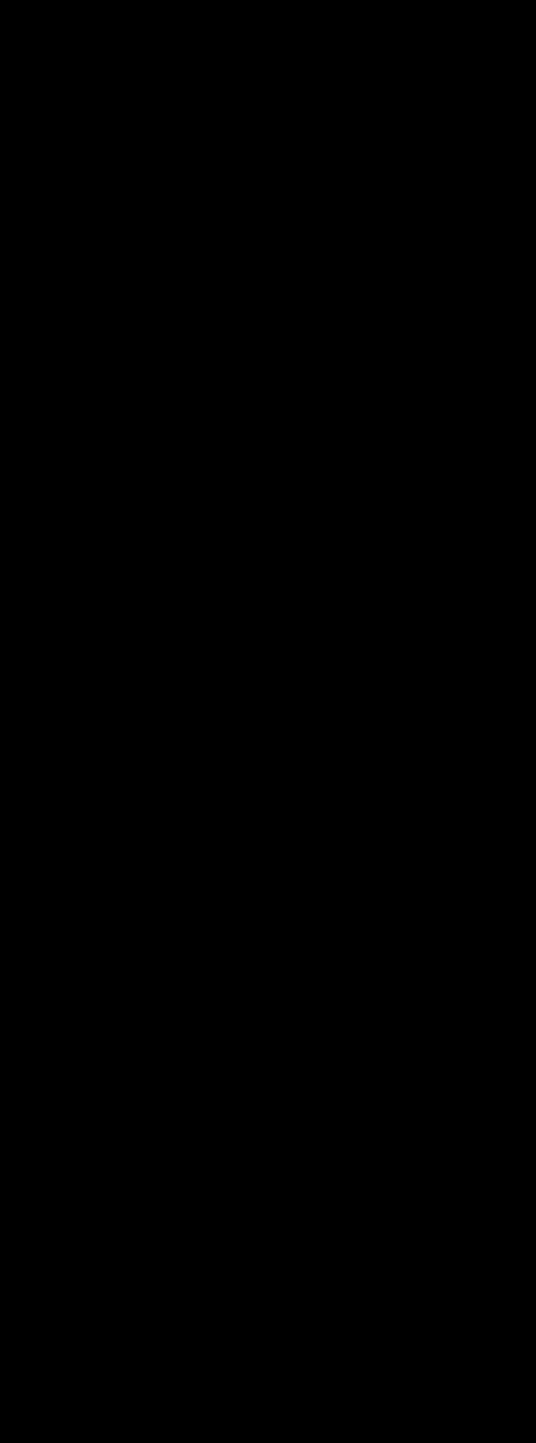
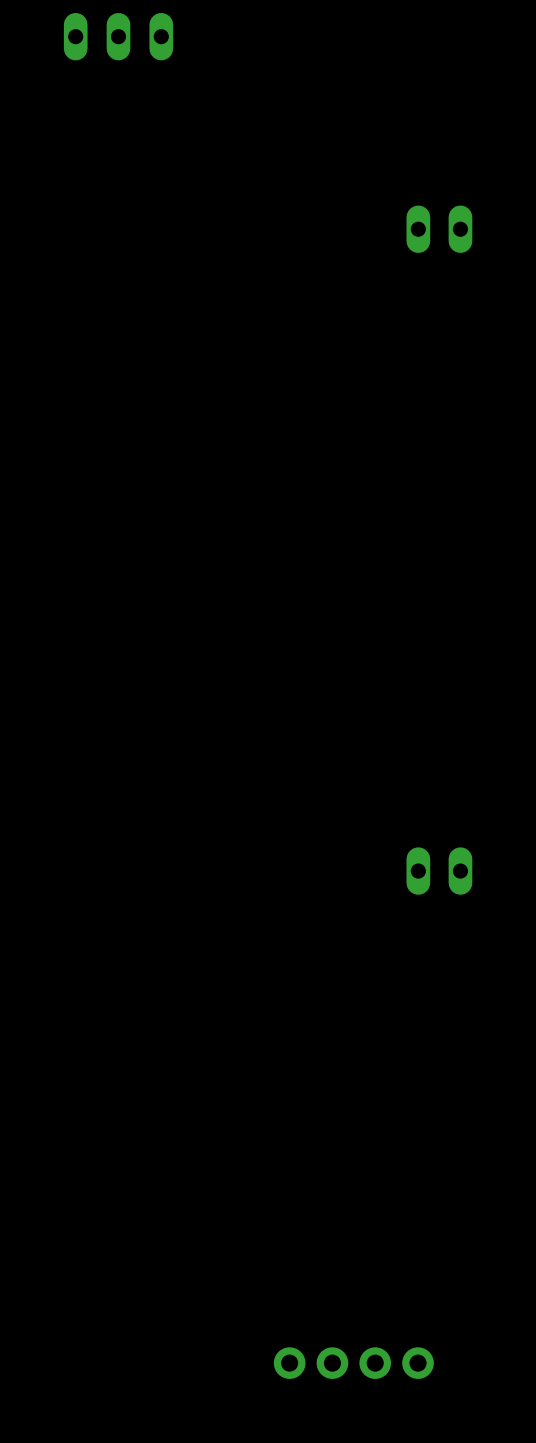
part: none -> (118, 36)
part: none -> (439, 229)
part: none -> (439, 871)
part: none -> (353, 1363)

